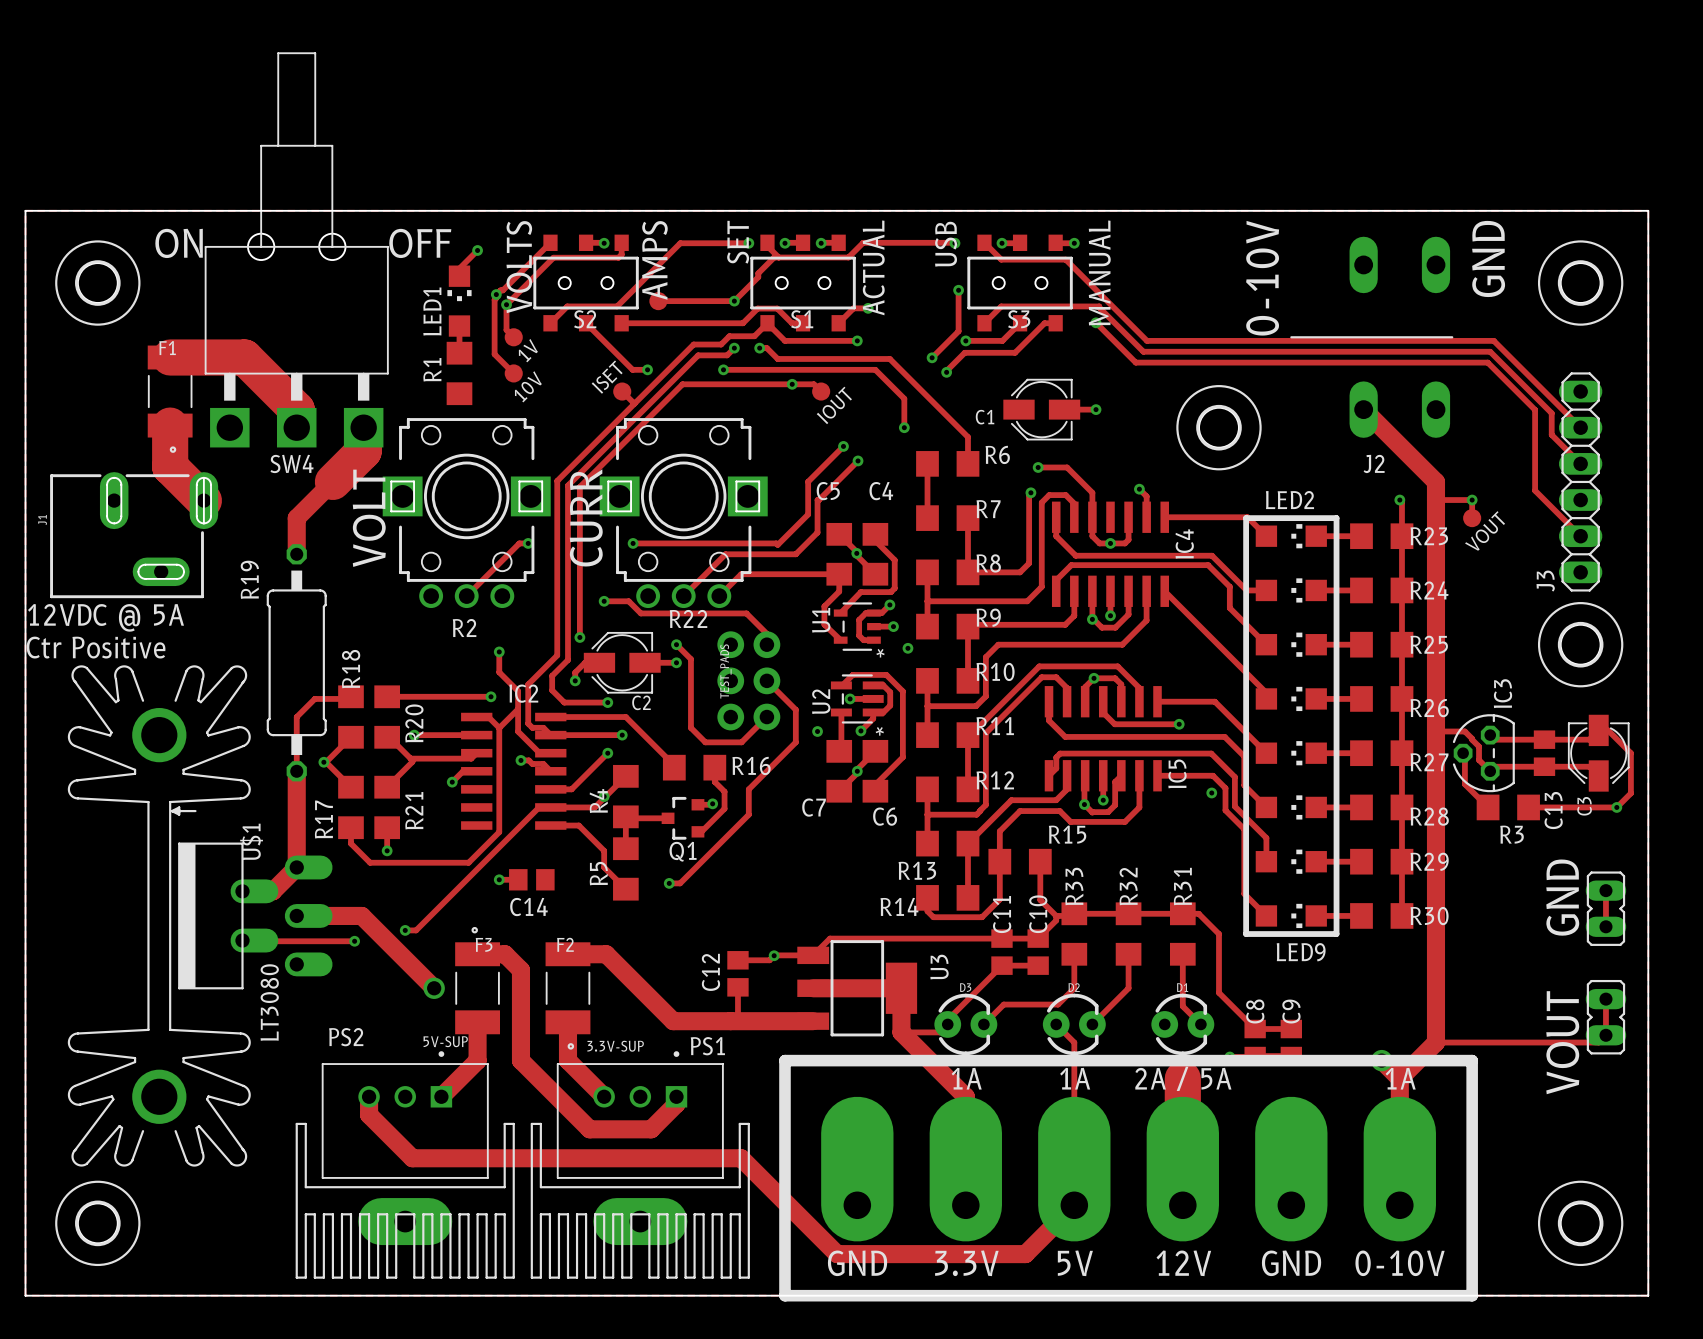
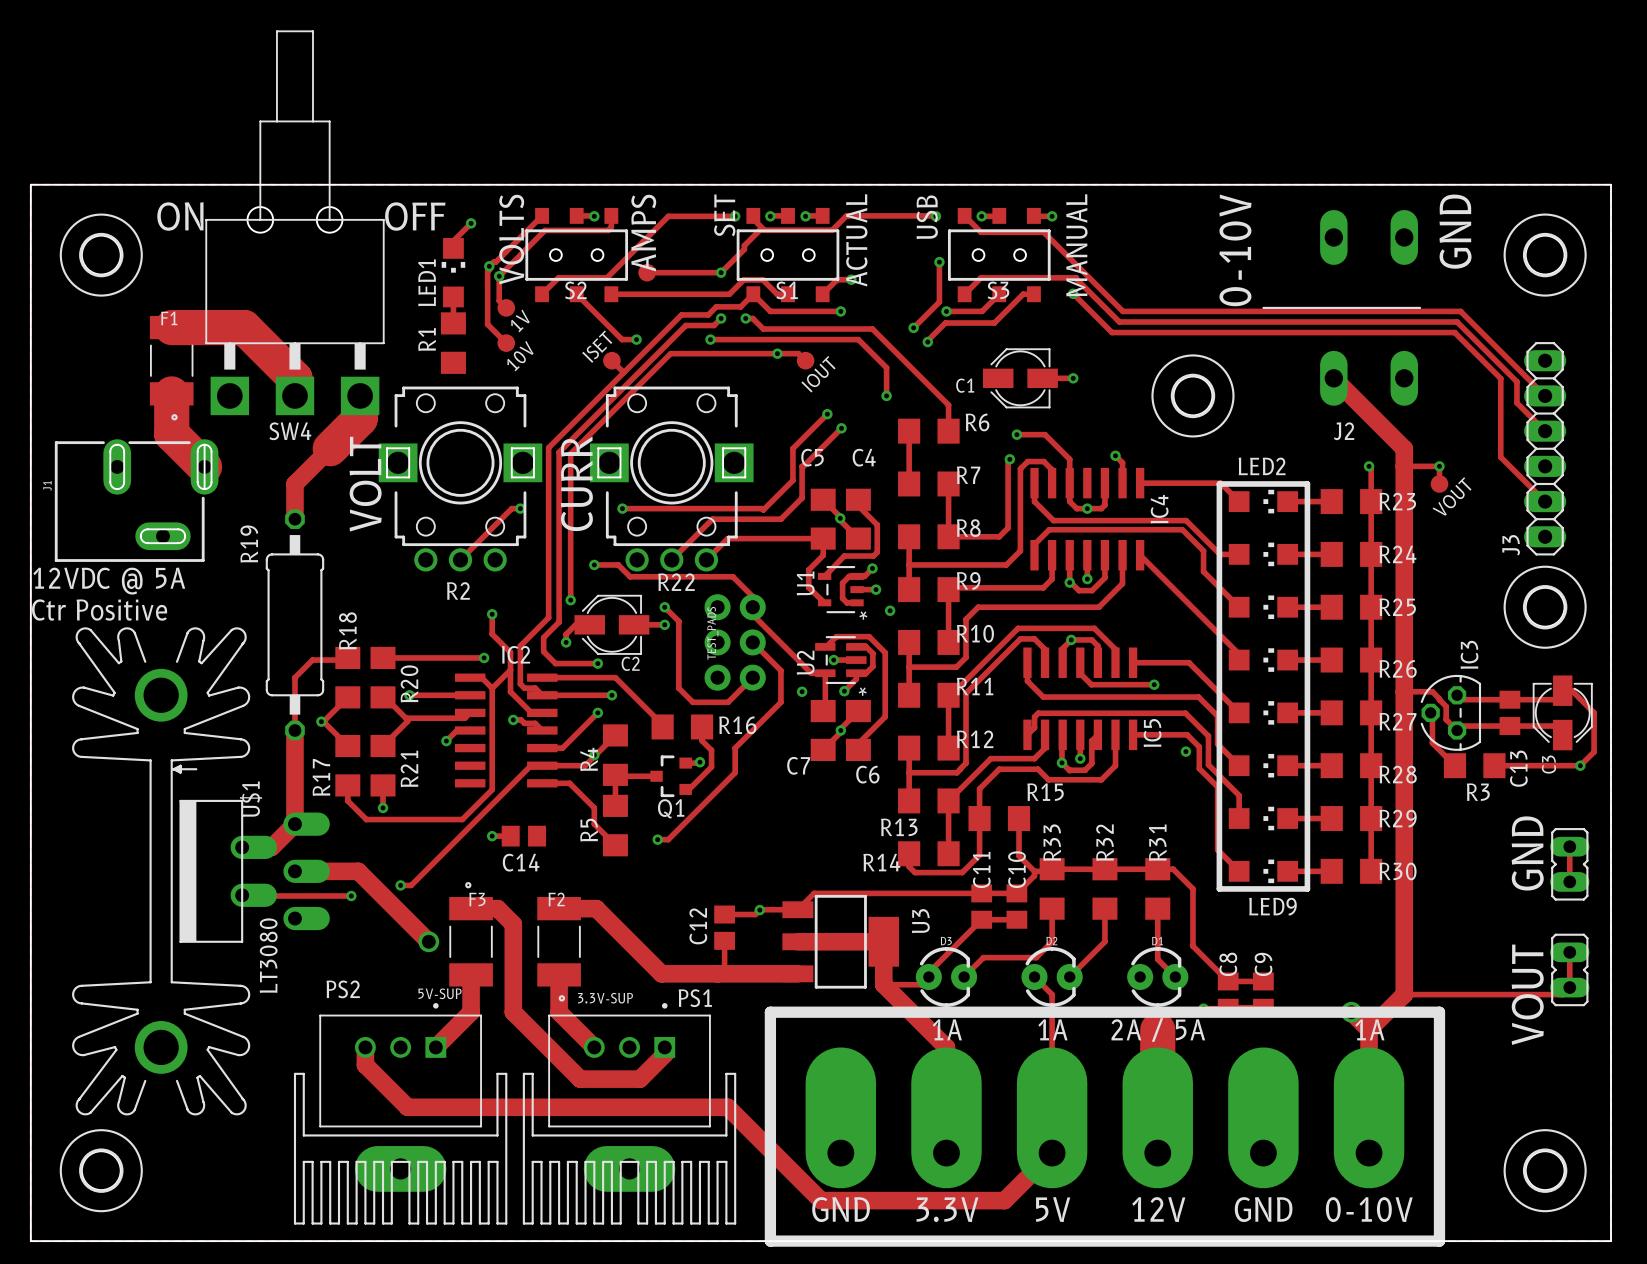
track: none -> (752, 607) (752, 614) (811, 673) (825, 673)

